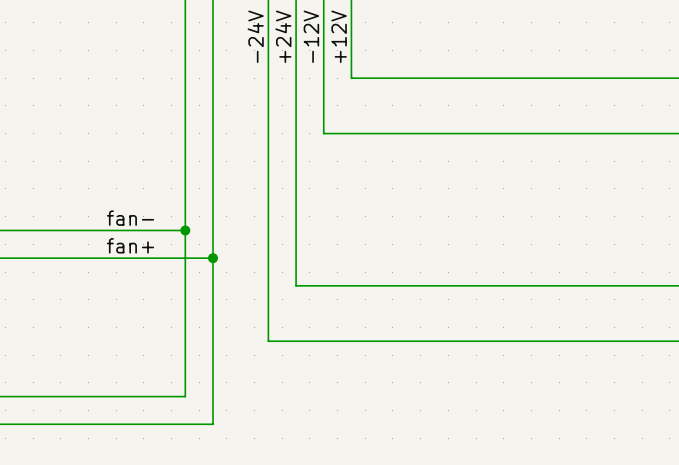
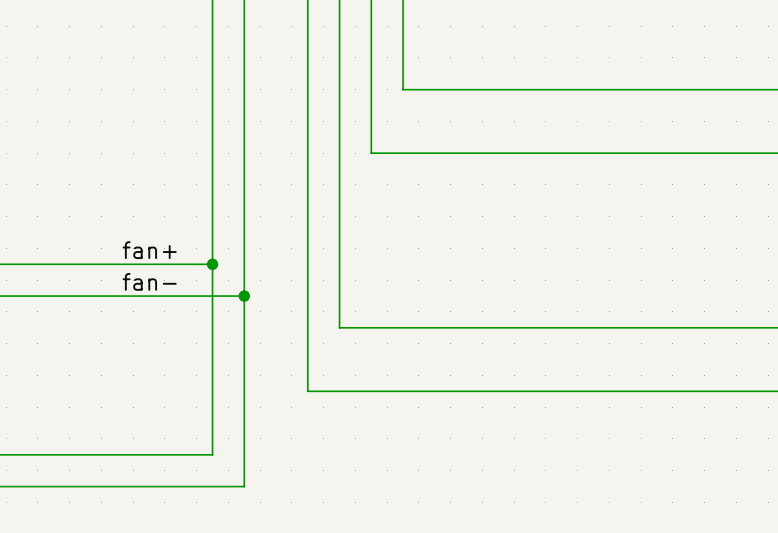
label: -24V (255, 36) -> none
label: +24V (283, 36) -> none
label: -12V (311, 36) -> none
label: +12V (339, 36) -> none
label: fan- (130, 218) -> fan+ (149, 250)
label: fan+ (130, 245) -> fan- (149, 281)

